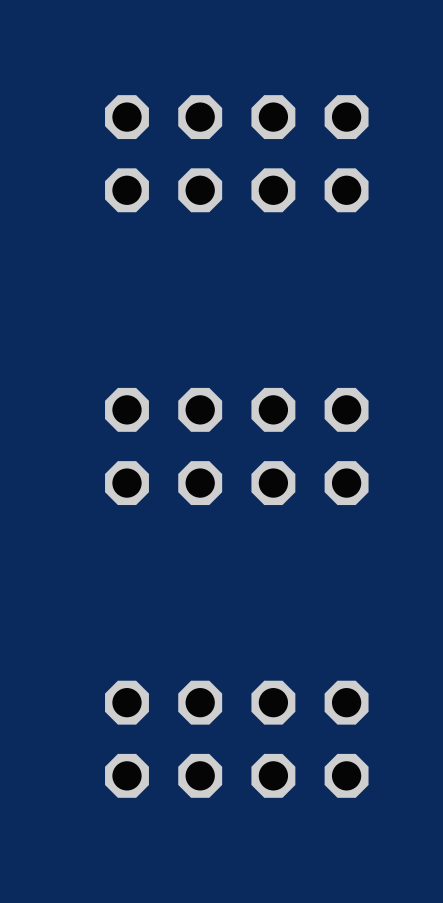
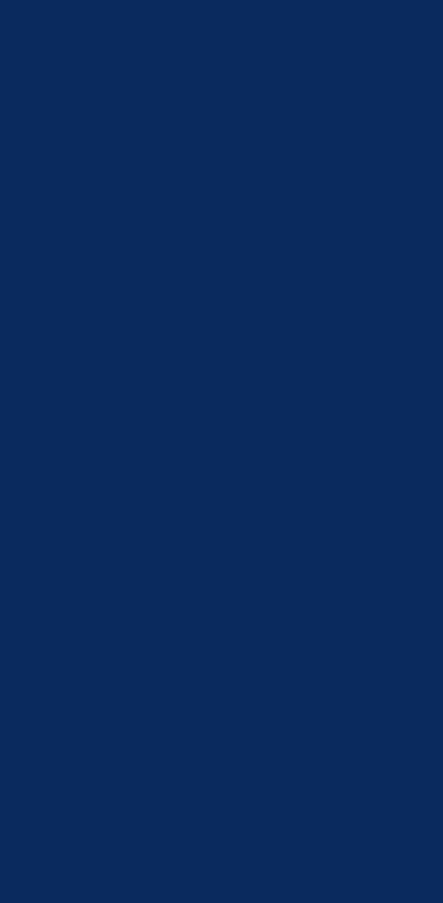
part: (236, 153) -> none
part: (236, 446) -> none
part: (236, 739) -> none

